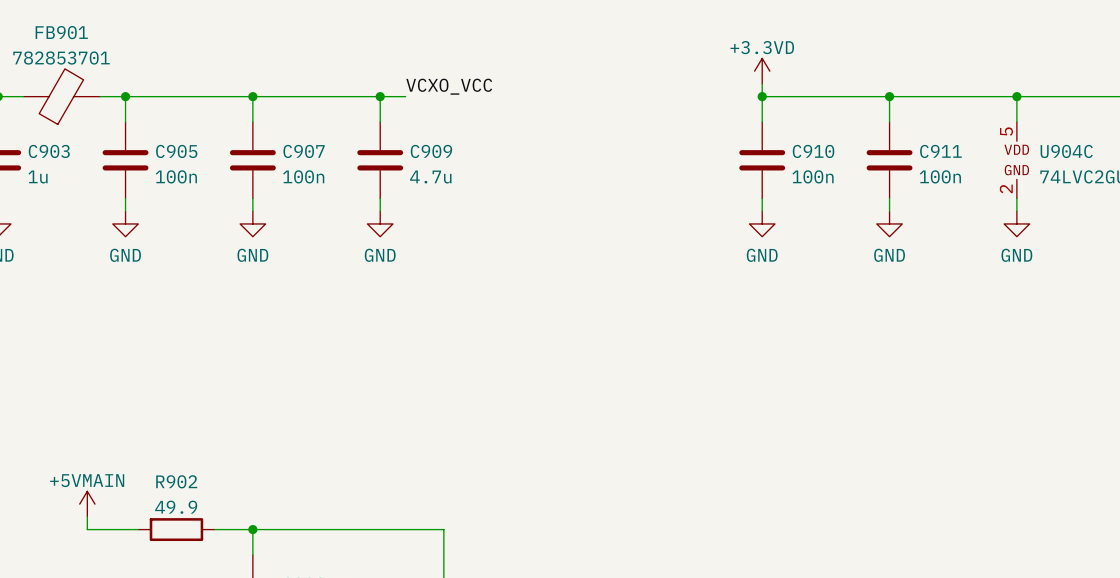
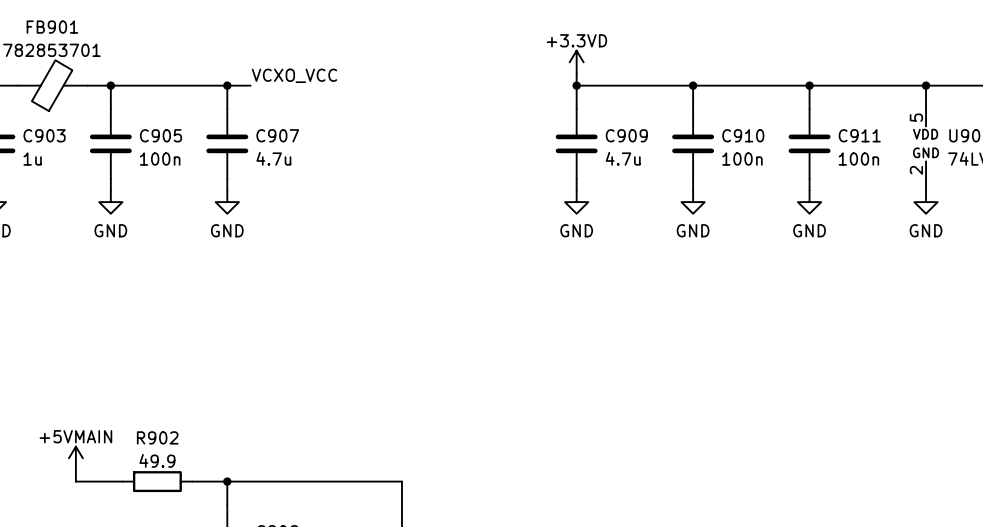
power symbol position: +3.3VD (762, 71) -> +3.3VD (576, 62)
wire: none -> (576, 74) (576, 108)
wire: (762, 83) (762, 96) -> (576, 85) (693, 85)
label position: VCXO_VCC (449, 86) -> VCXO_VCC (294, 75)
wire: (278, 96) (405, 96) -> none
wire: (380, 96) (380, 122) -> none
junction: (380, 96) -> none
junction: none -> (576, 85)
C909 position: (380, 160) -> (576, 143)
C907 value: 100n (303, 176) -> 4.7u (273, 158)
wire: (380, 198) (380, 211) -> none
wire: none -> (576, 178) (576, 190)
power symbol: GND (380, 223) -> none
power symbol: none -> GND (576, 202)

